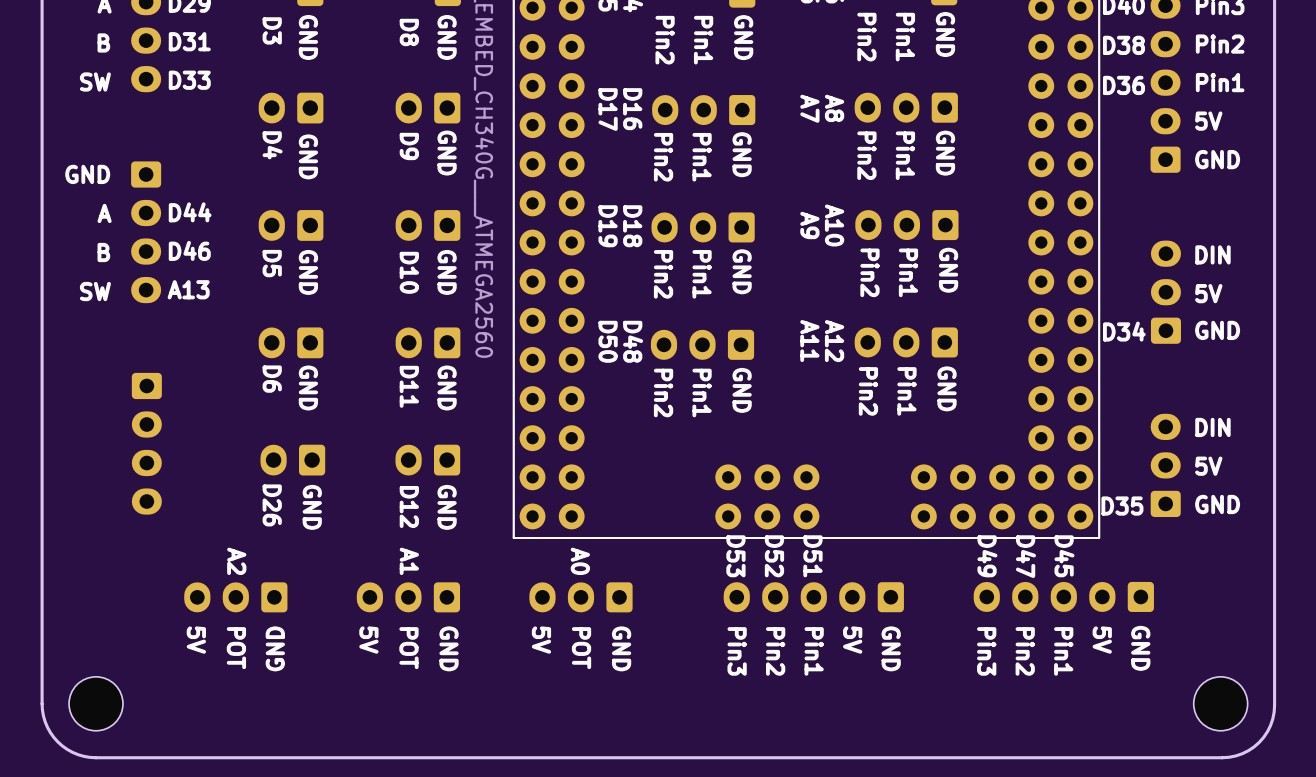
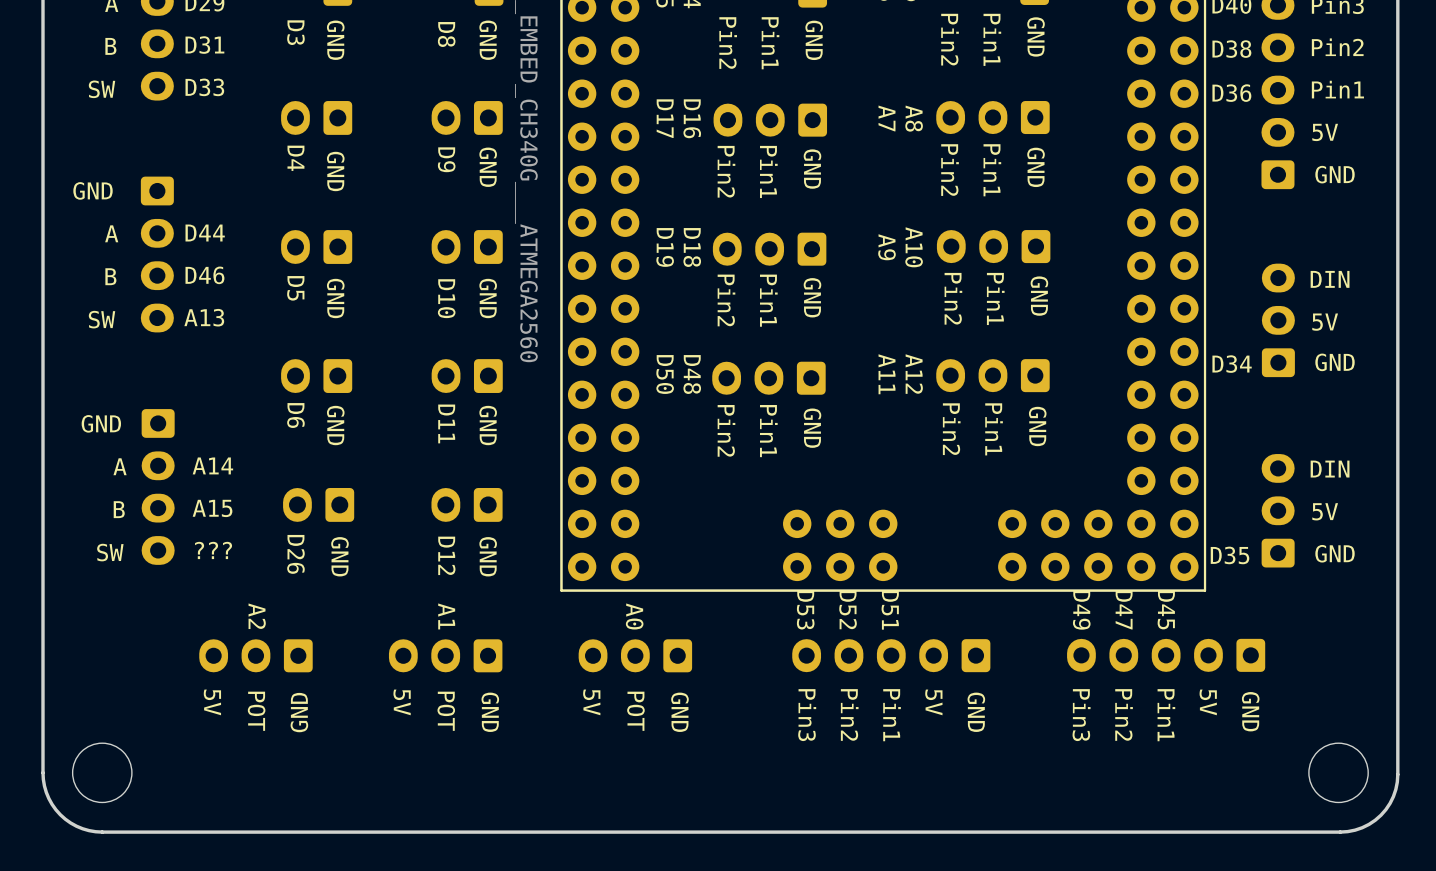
text: none -> GND (101, 423)
text: none -> A14 (212, 465)
text: none -> A (120, 466)
text: none -> A15 (212, 508)
text: none -> B (119, 509)
text: none -> ??? (213, 550)
text: none -> SW (110, 552)

